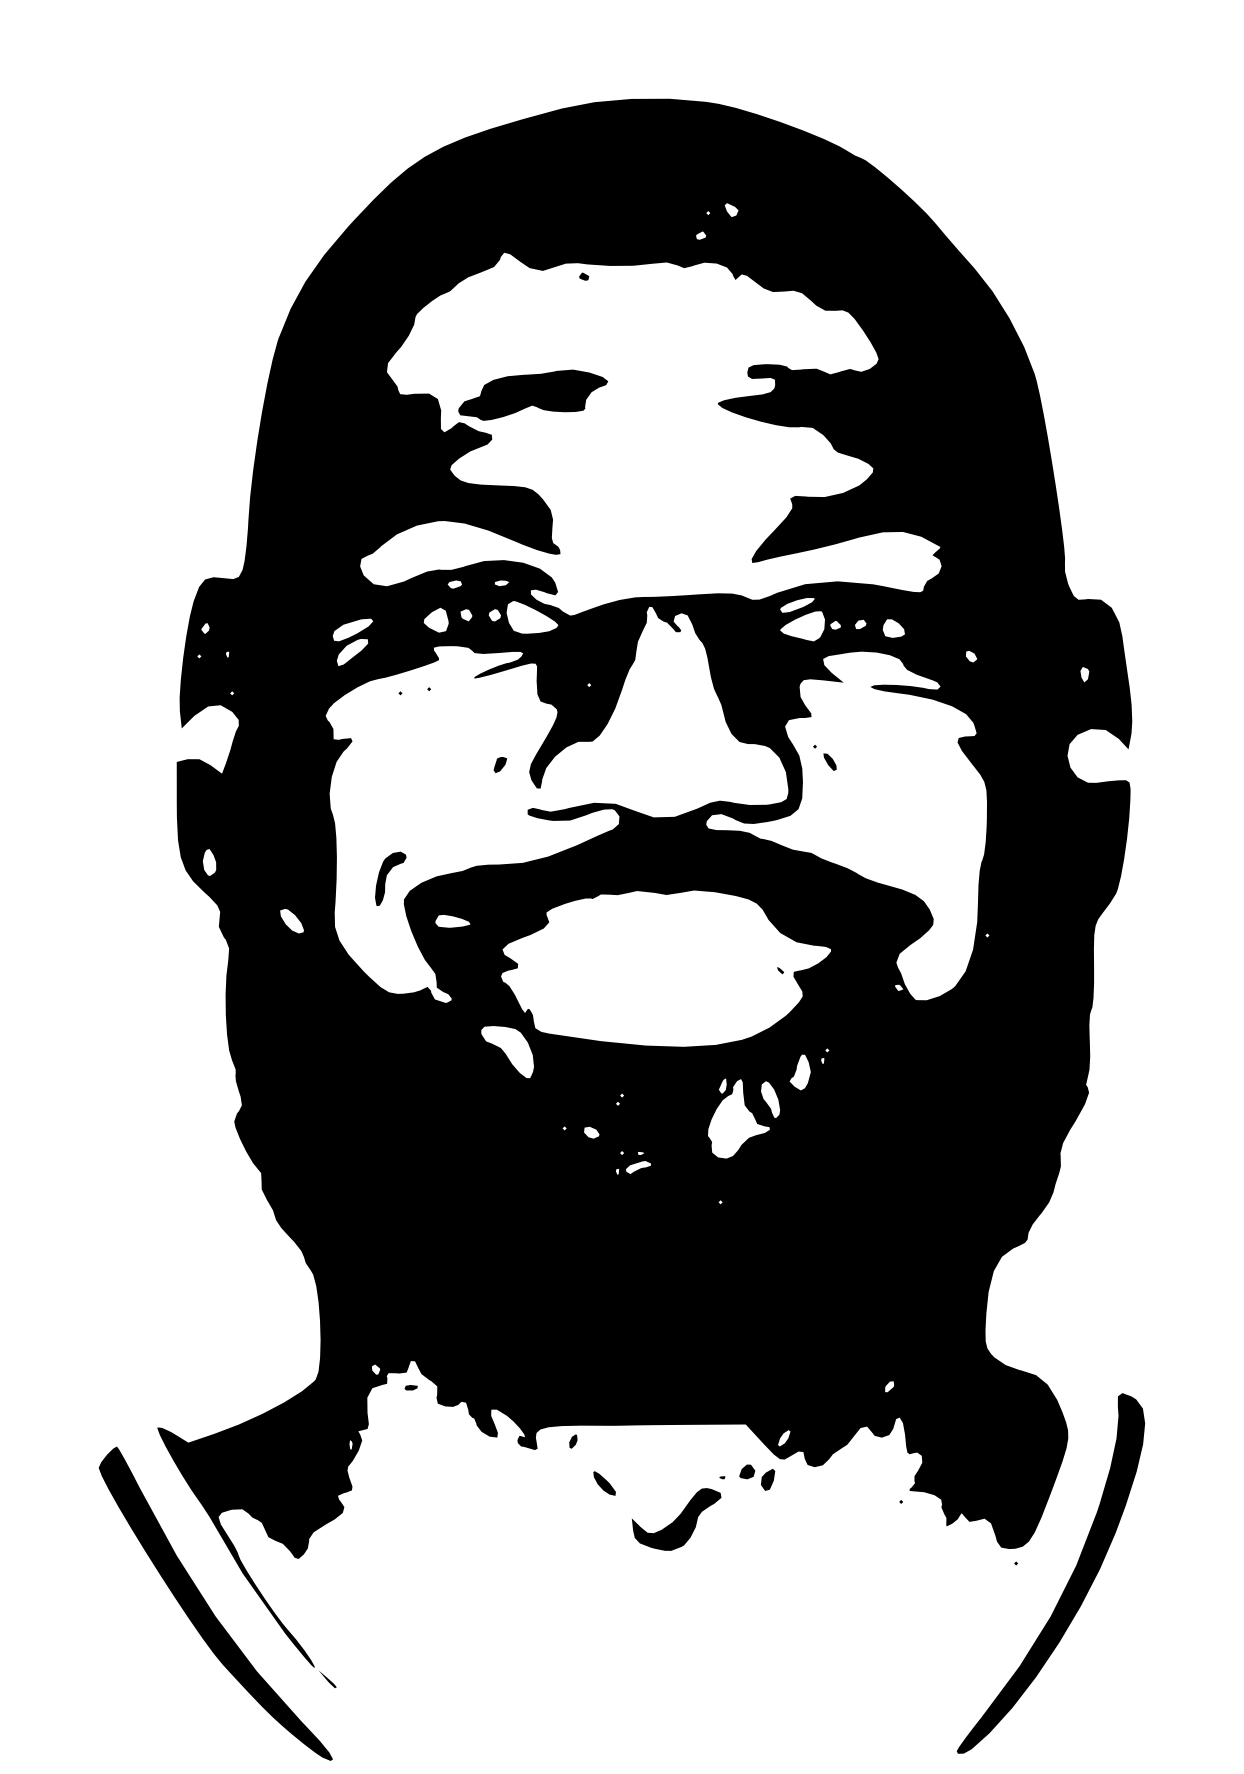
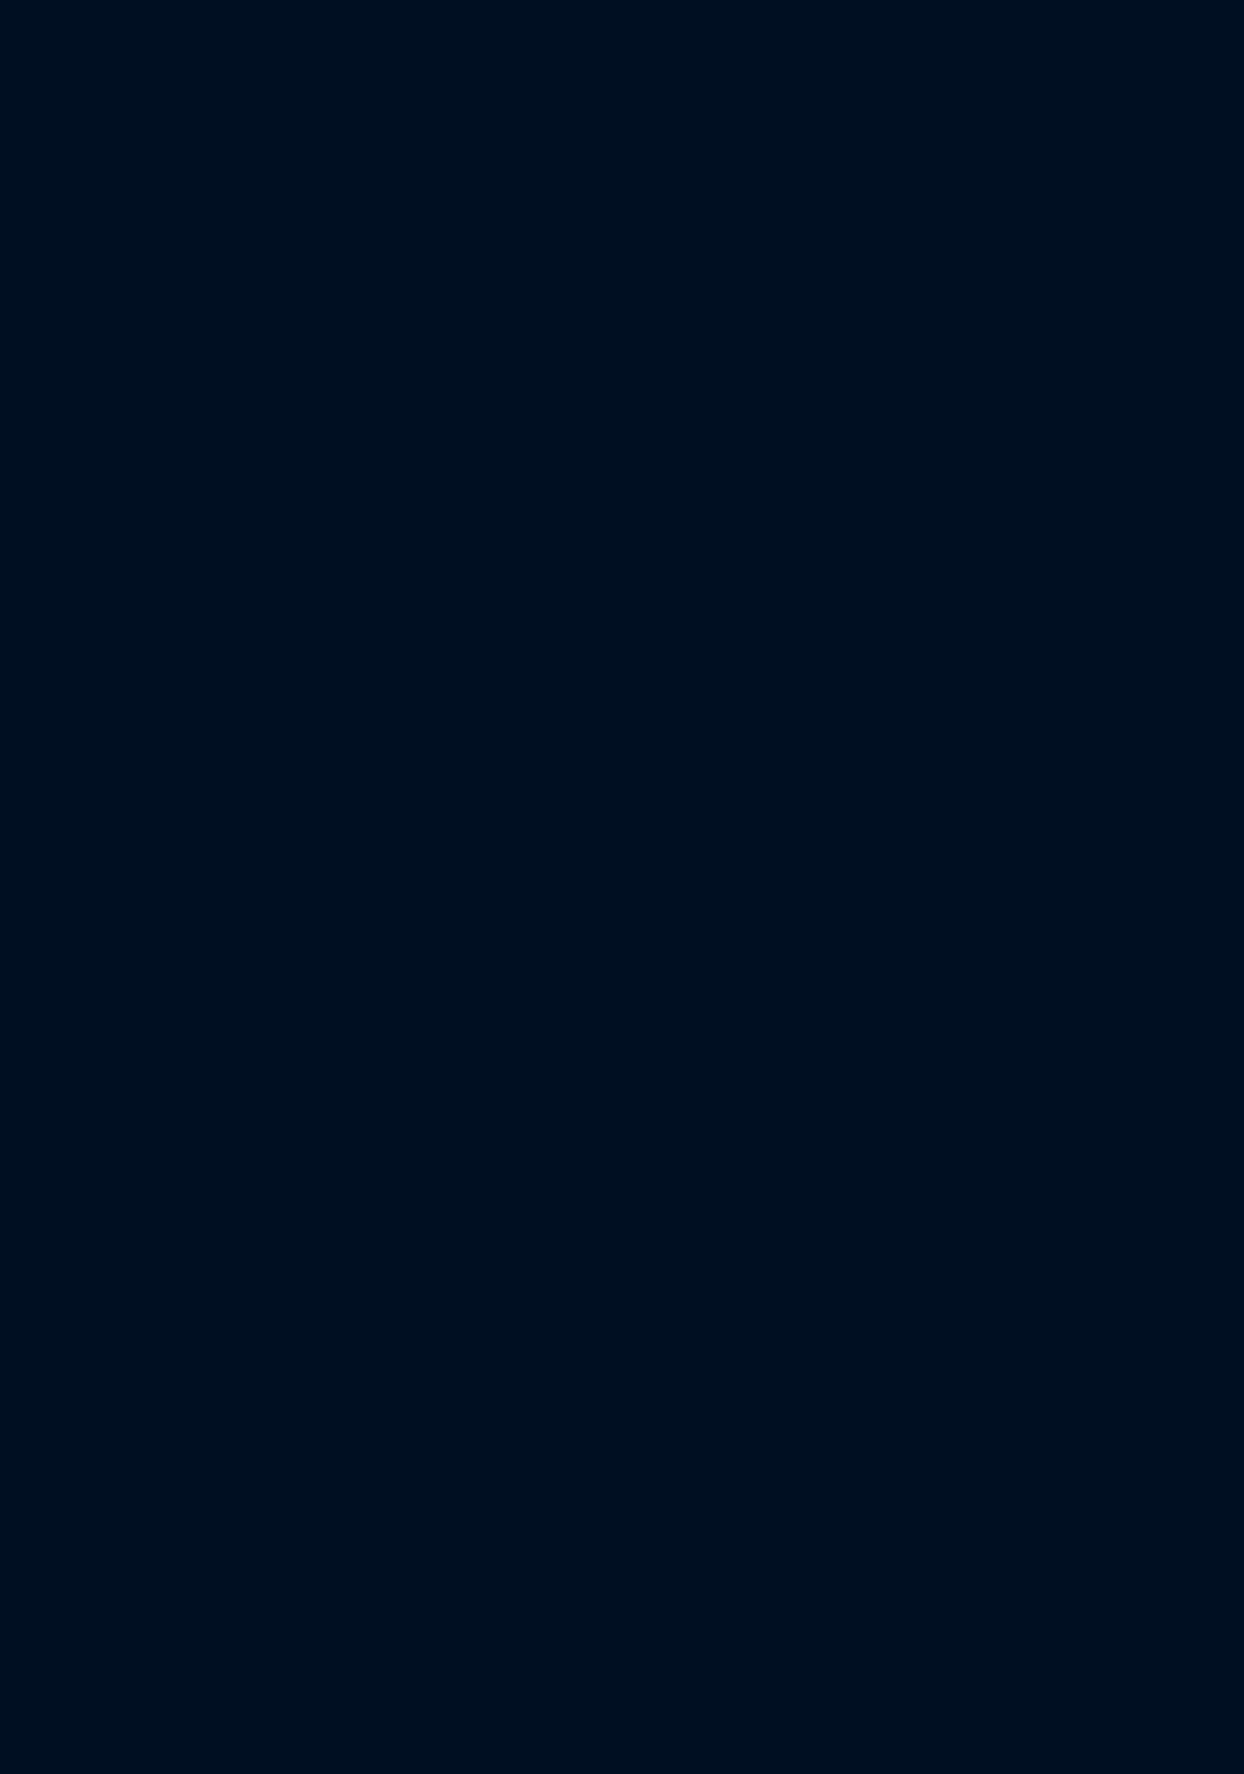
drawing: [98, 98, 1146, 1762] -> none

